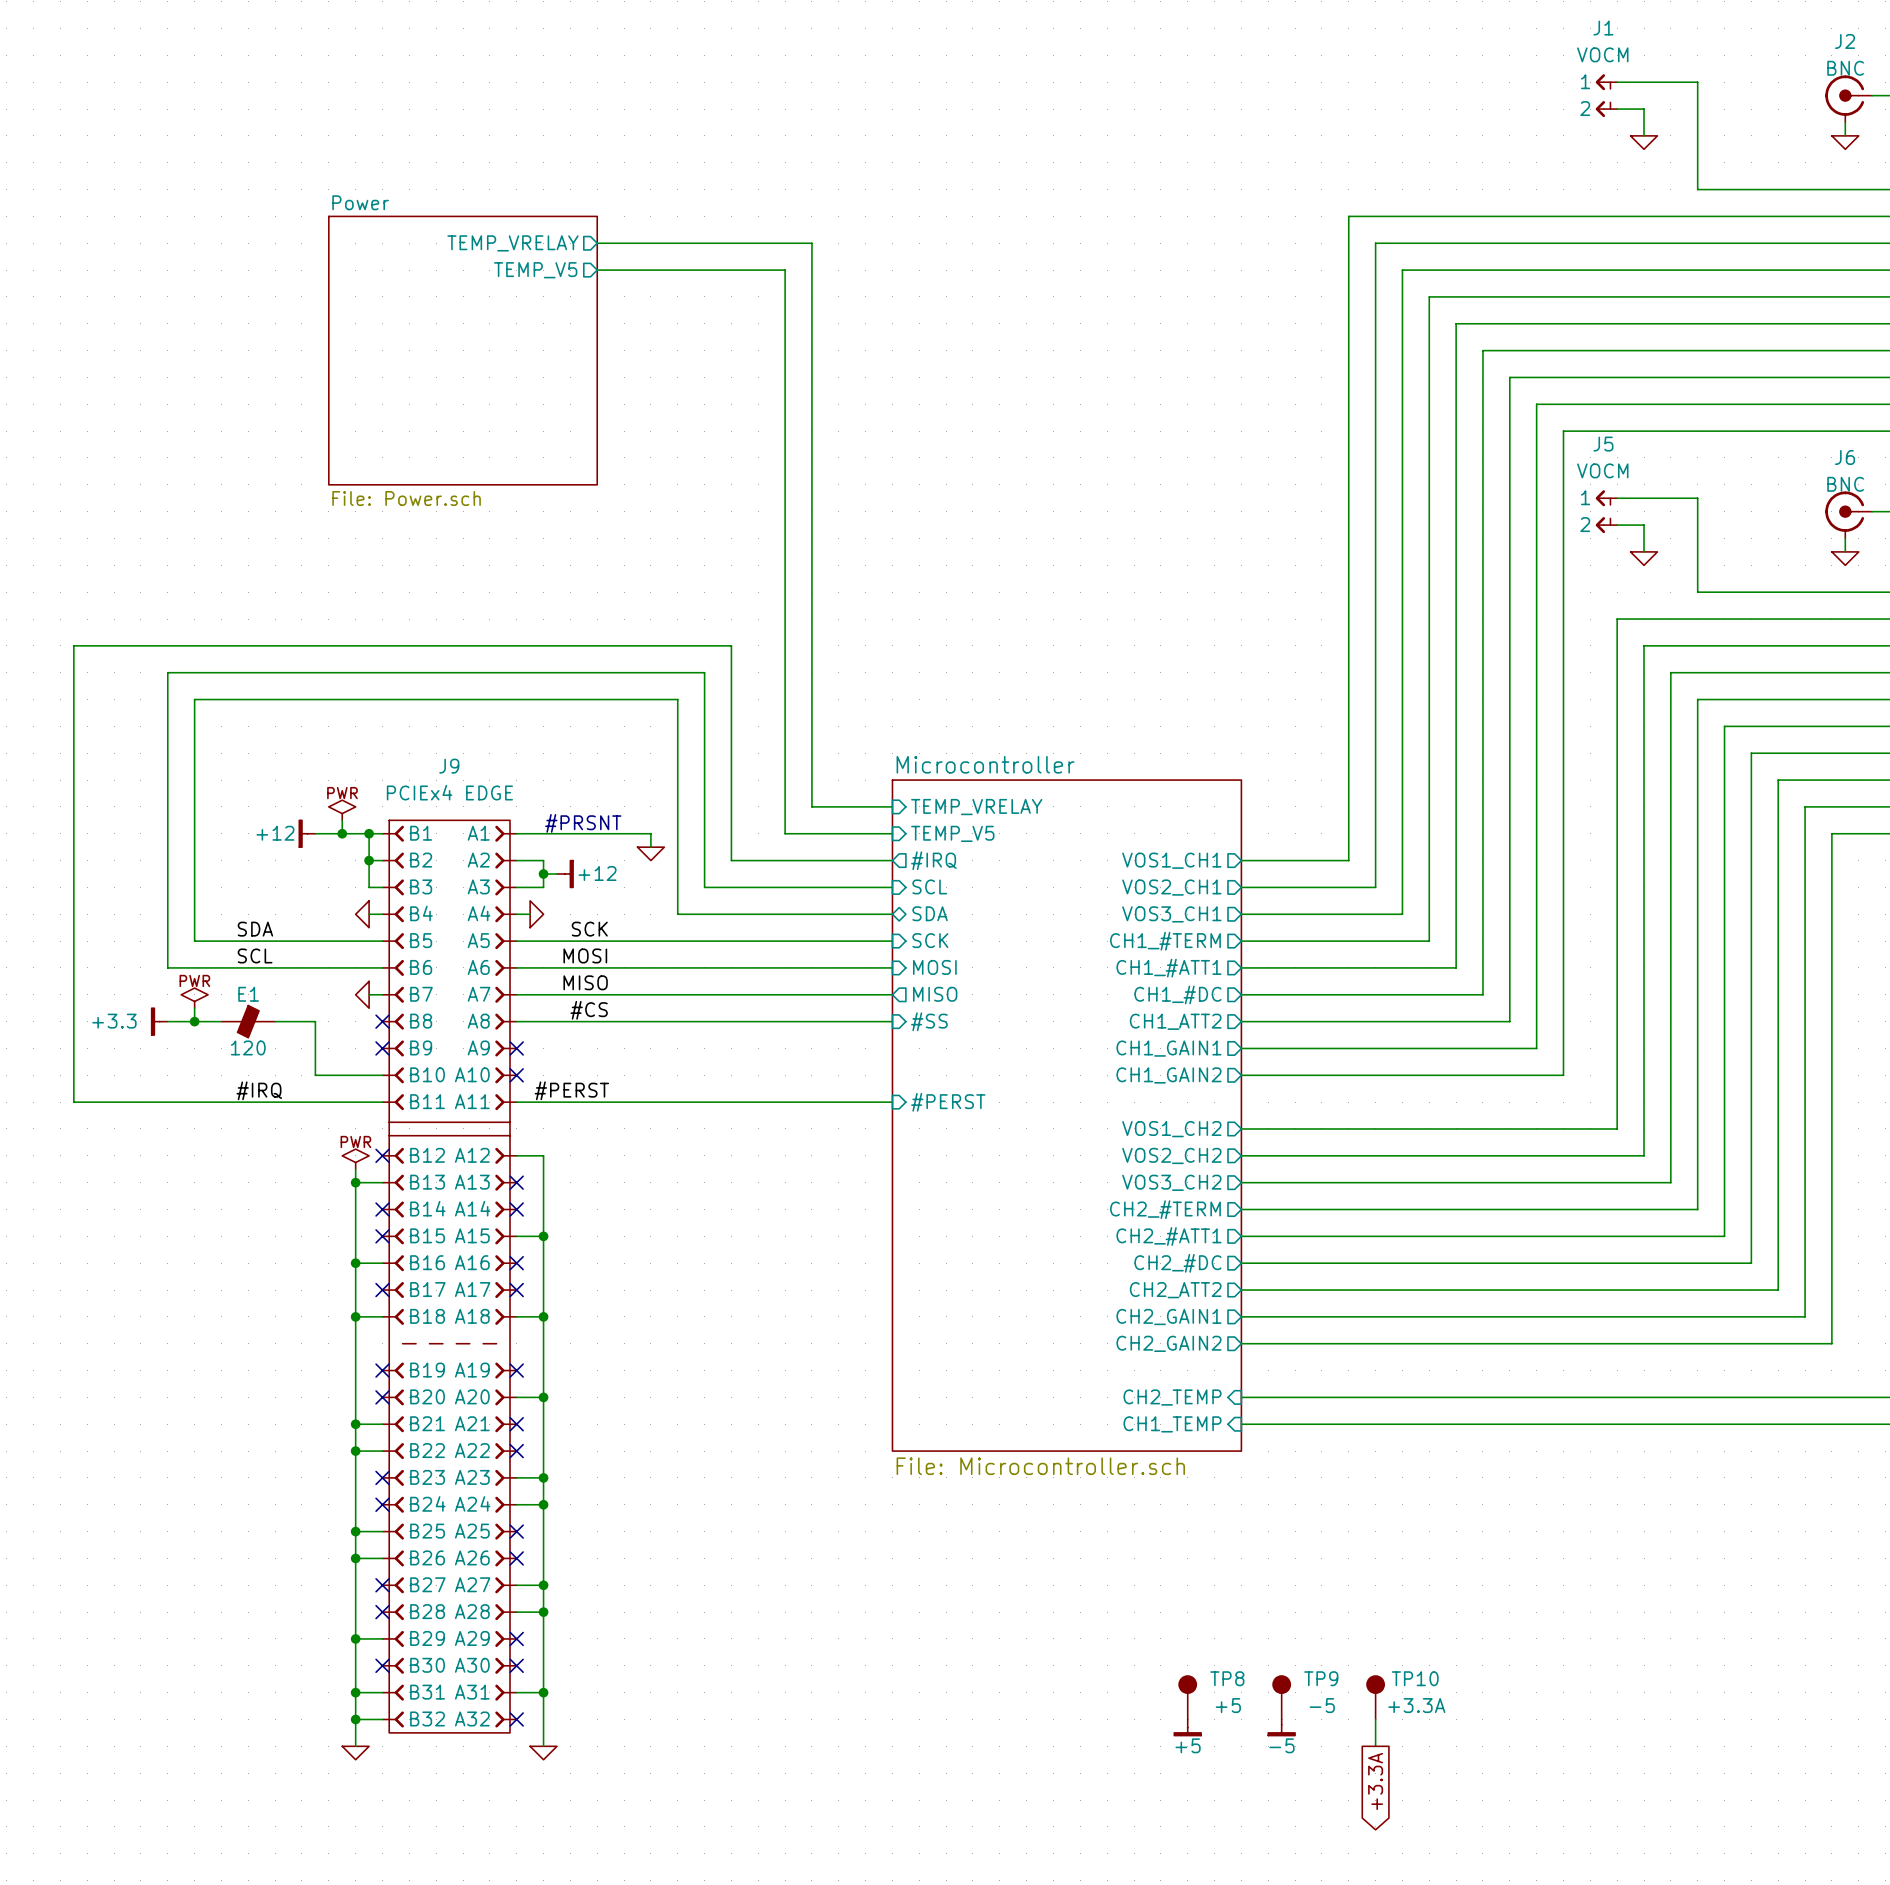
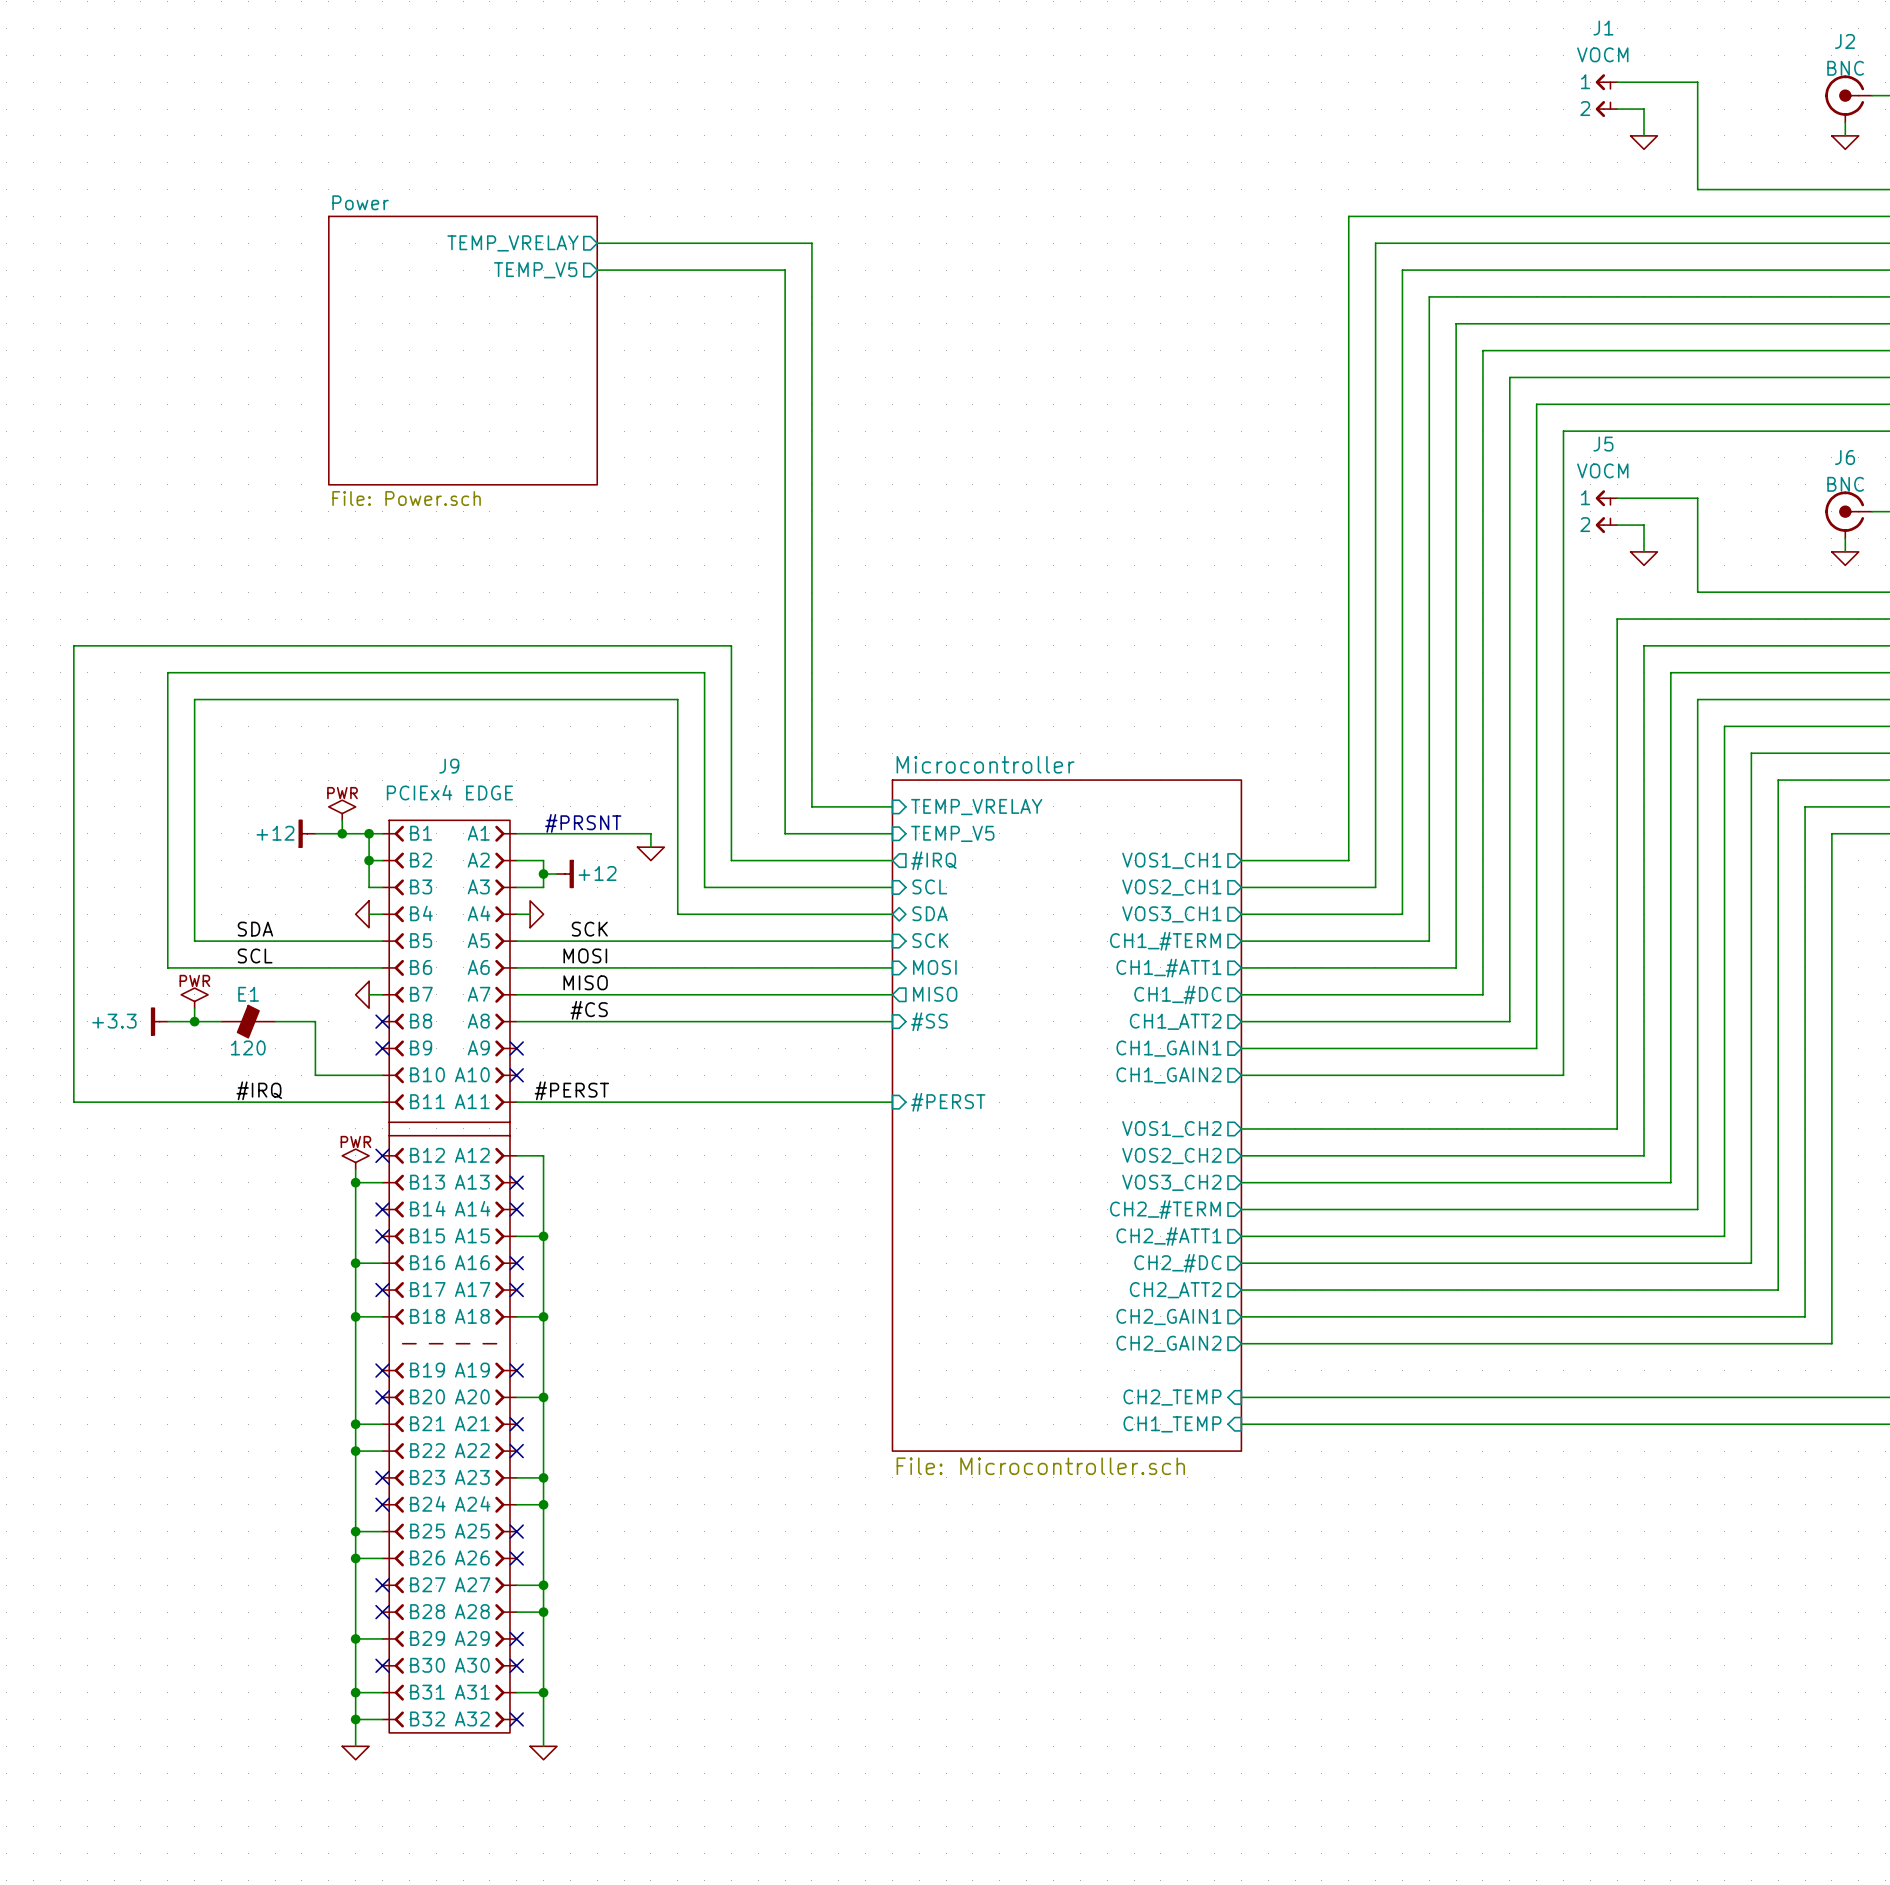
TP8: +5 (1187, 1697) -> none
TP9: -5 (1281, 1697) -> none
TP10: +3.3A (1375, 1697) -> none
wire: (1375, 1719) (1375, 1746) -> none
power symbol: +5 (1187, 1727) -> none
power symbol: -5 (1281, 1727) -> none
global label: +3.3A (1375, 1781) -> none

